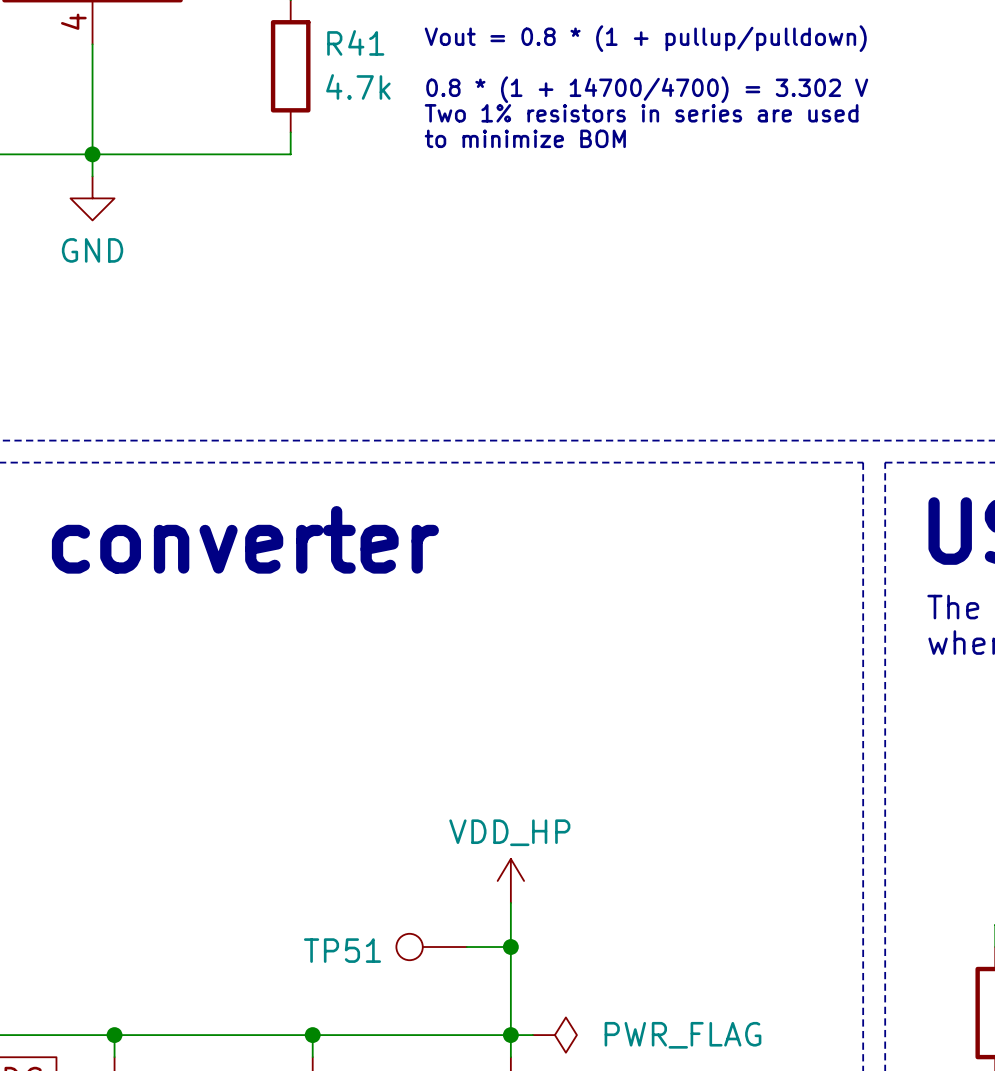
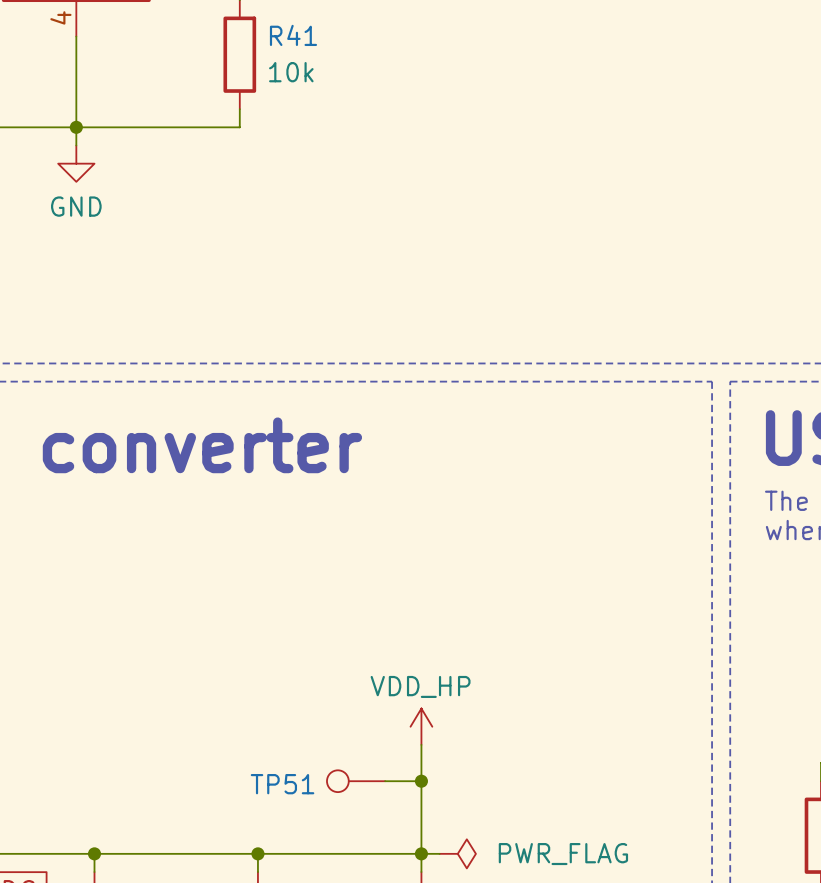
text: Vout = 0.8 * (1 + pullup/pulldown) (645, 38) -> none
R41 value: 4.7k (358, 86) -> 10k (291, 72)
text: 0.8 * (1 + 14700/4700) = 3.302 V (647, 89) -> none
text: Two 1% resistors in series are used (641, 113) -> none
text: to minimize BOM (525, 138) -> none

